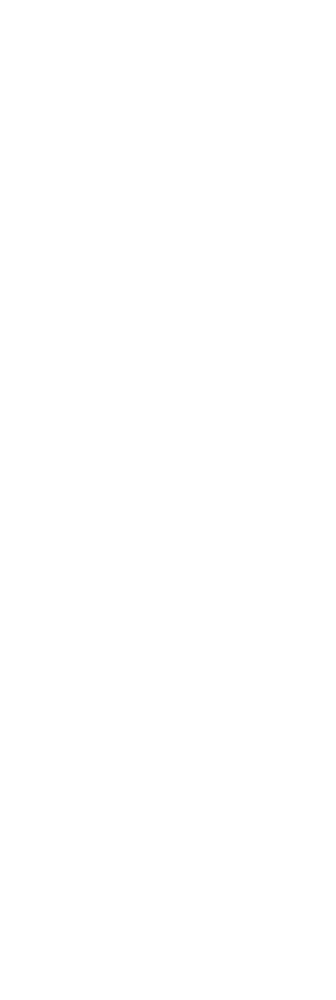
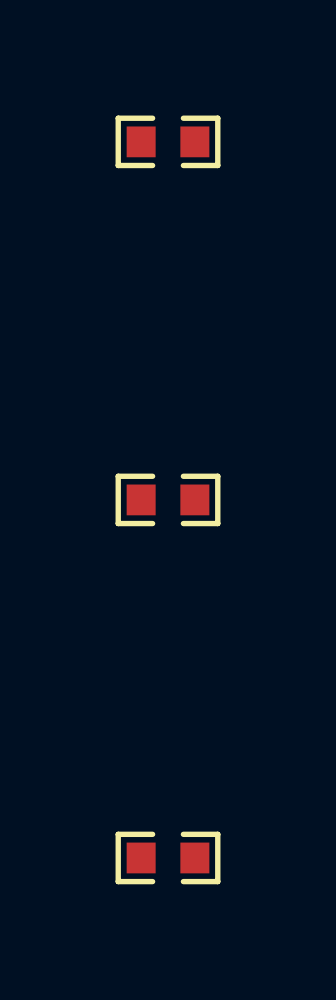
part: none -> (168, 141)
part: none -> (168, 499)
part: none -> (168, 857)

